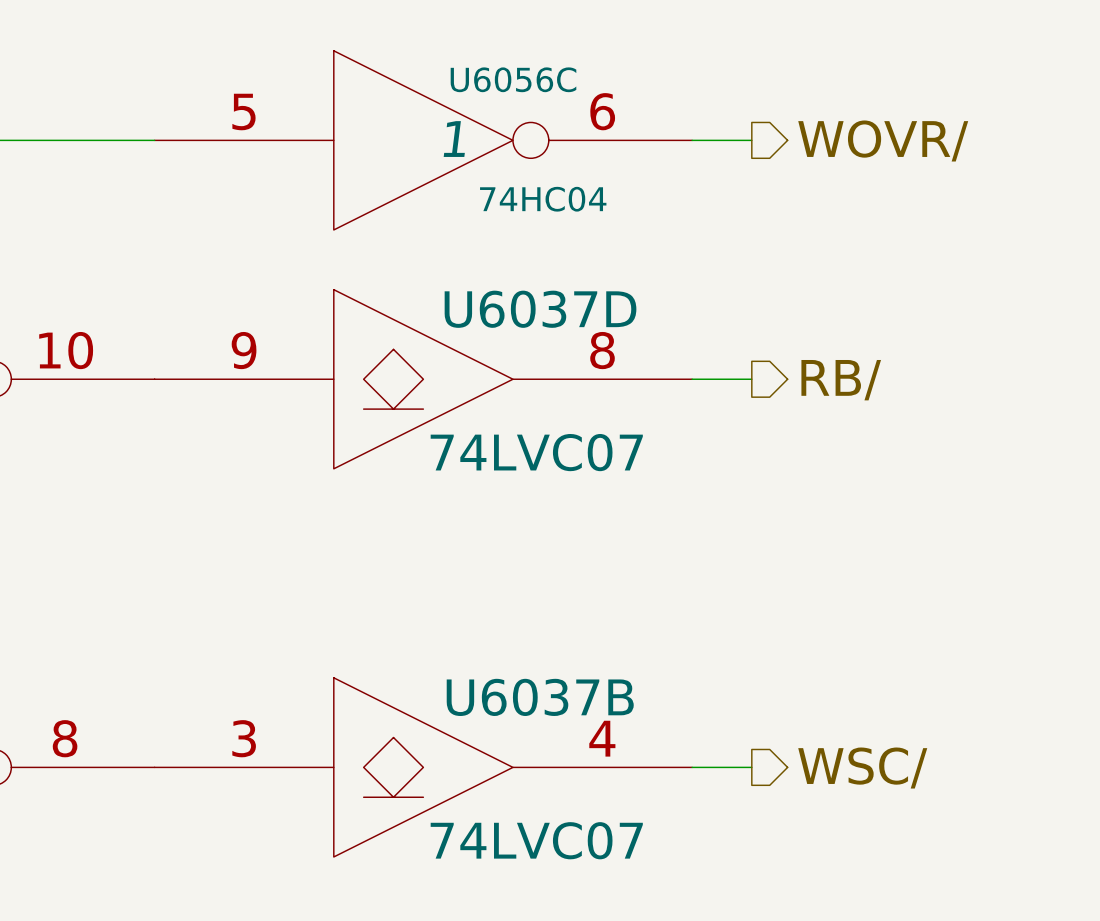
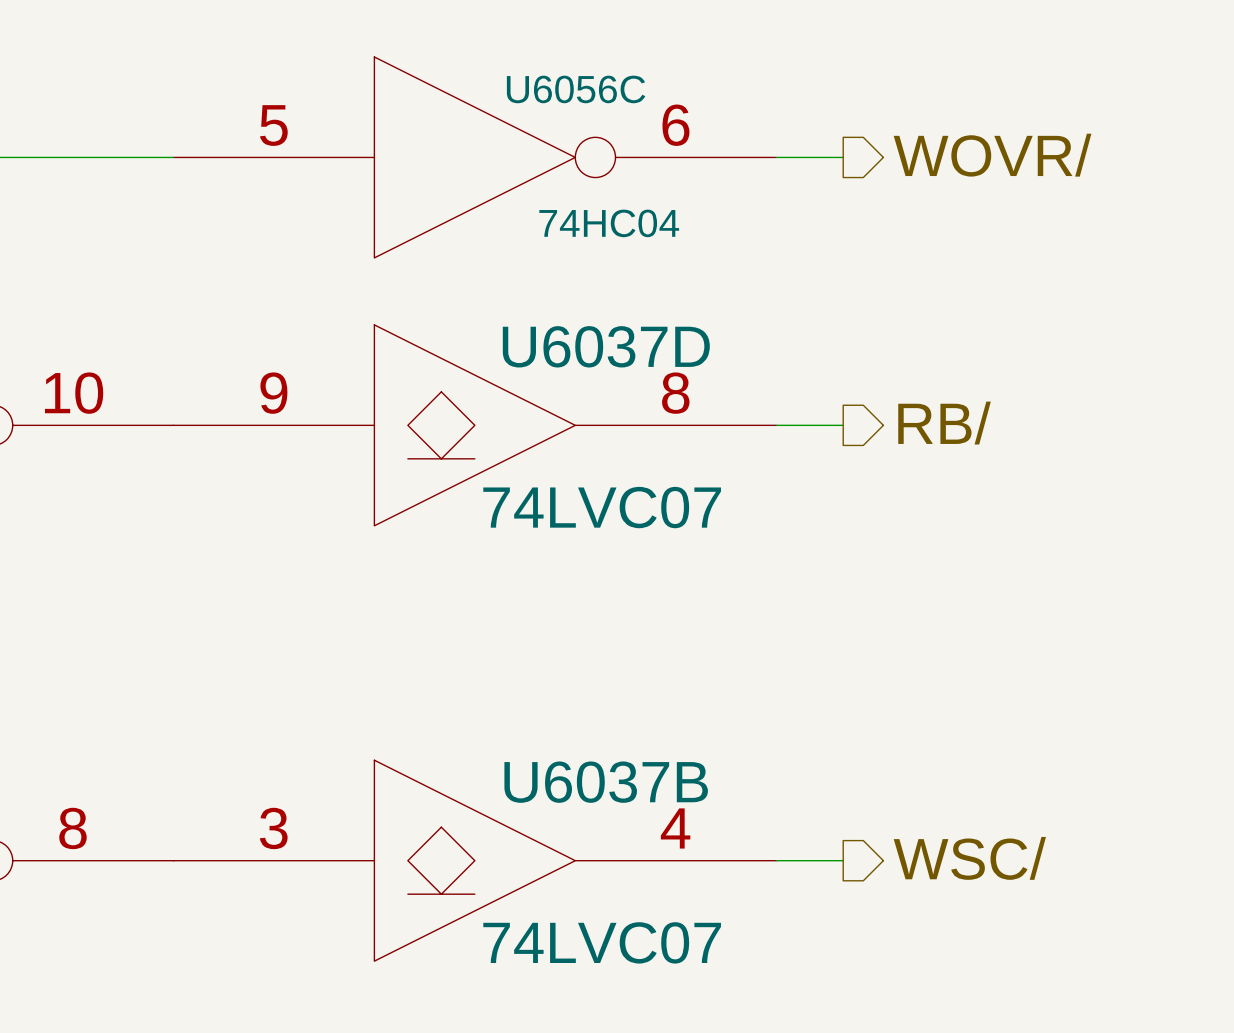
U6056C text: 1 (454, 139) -> none

